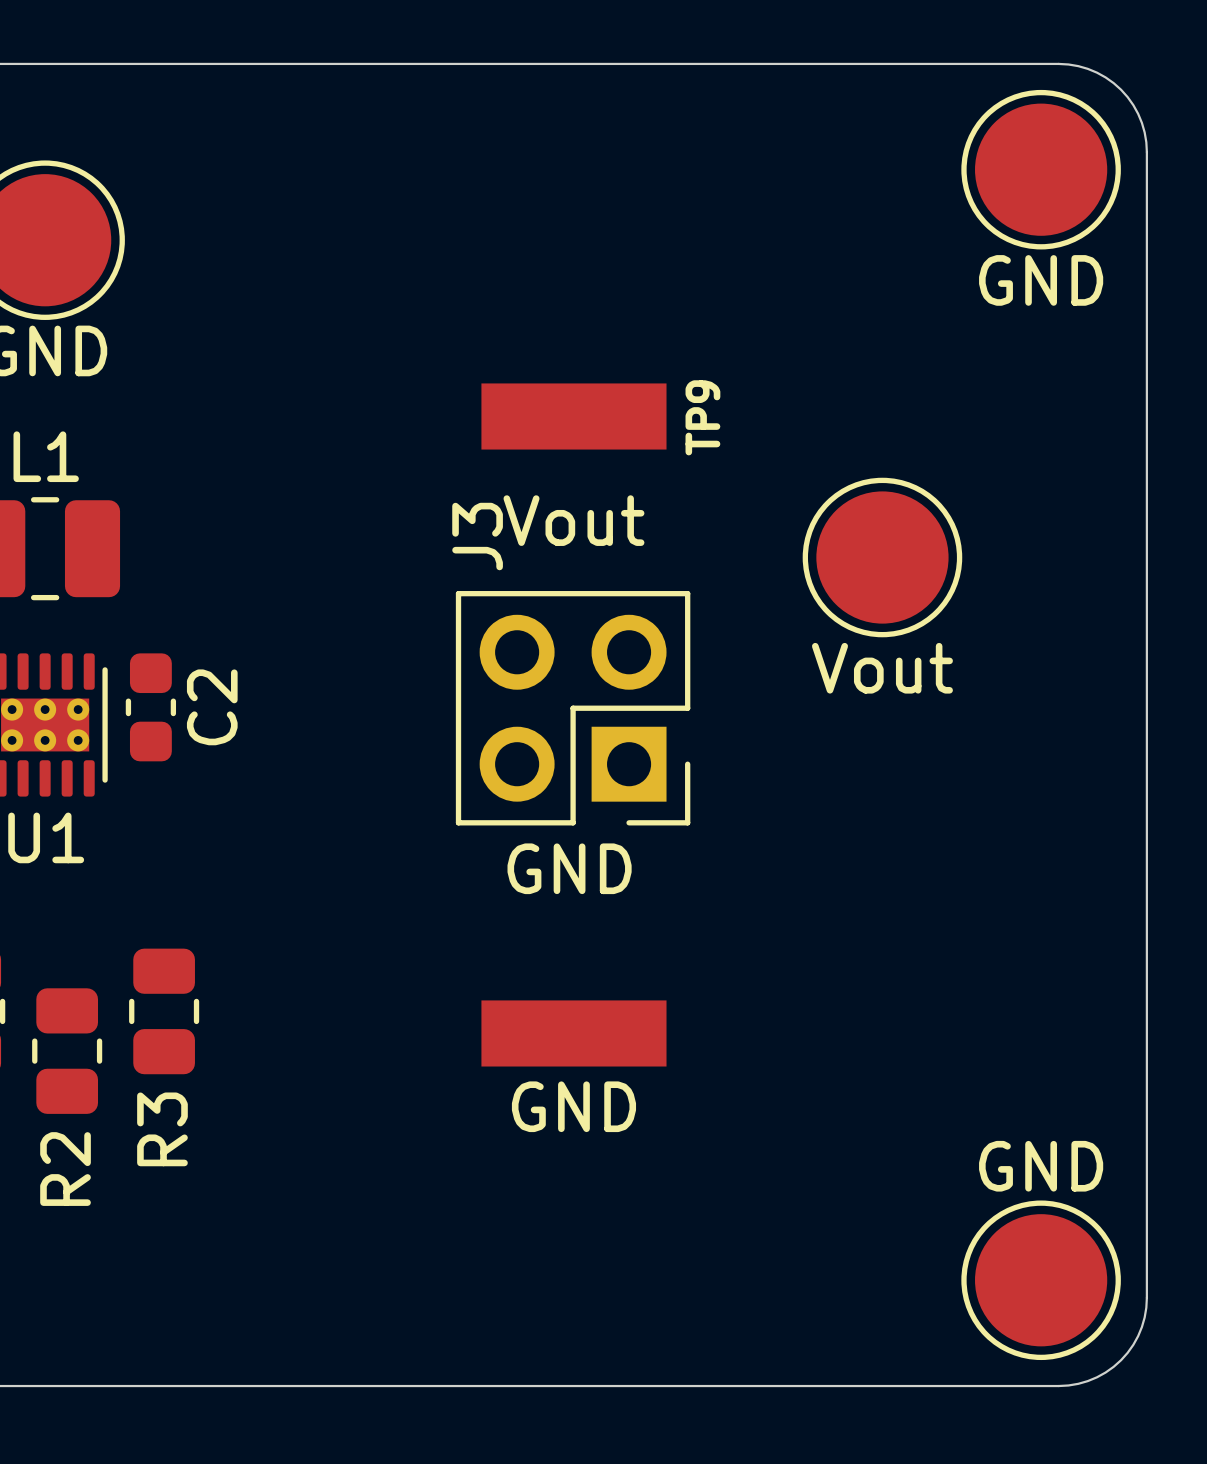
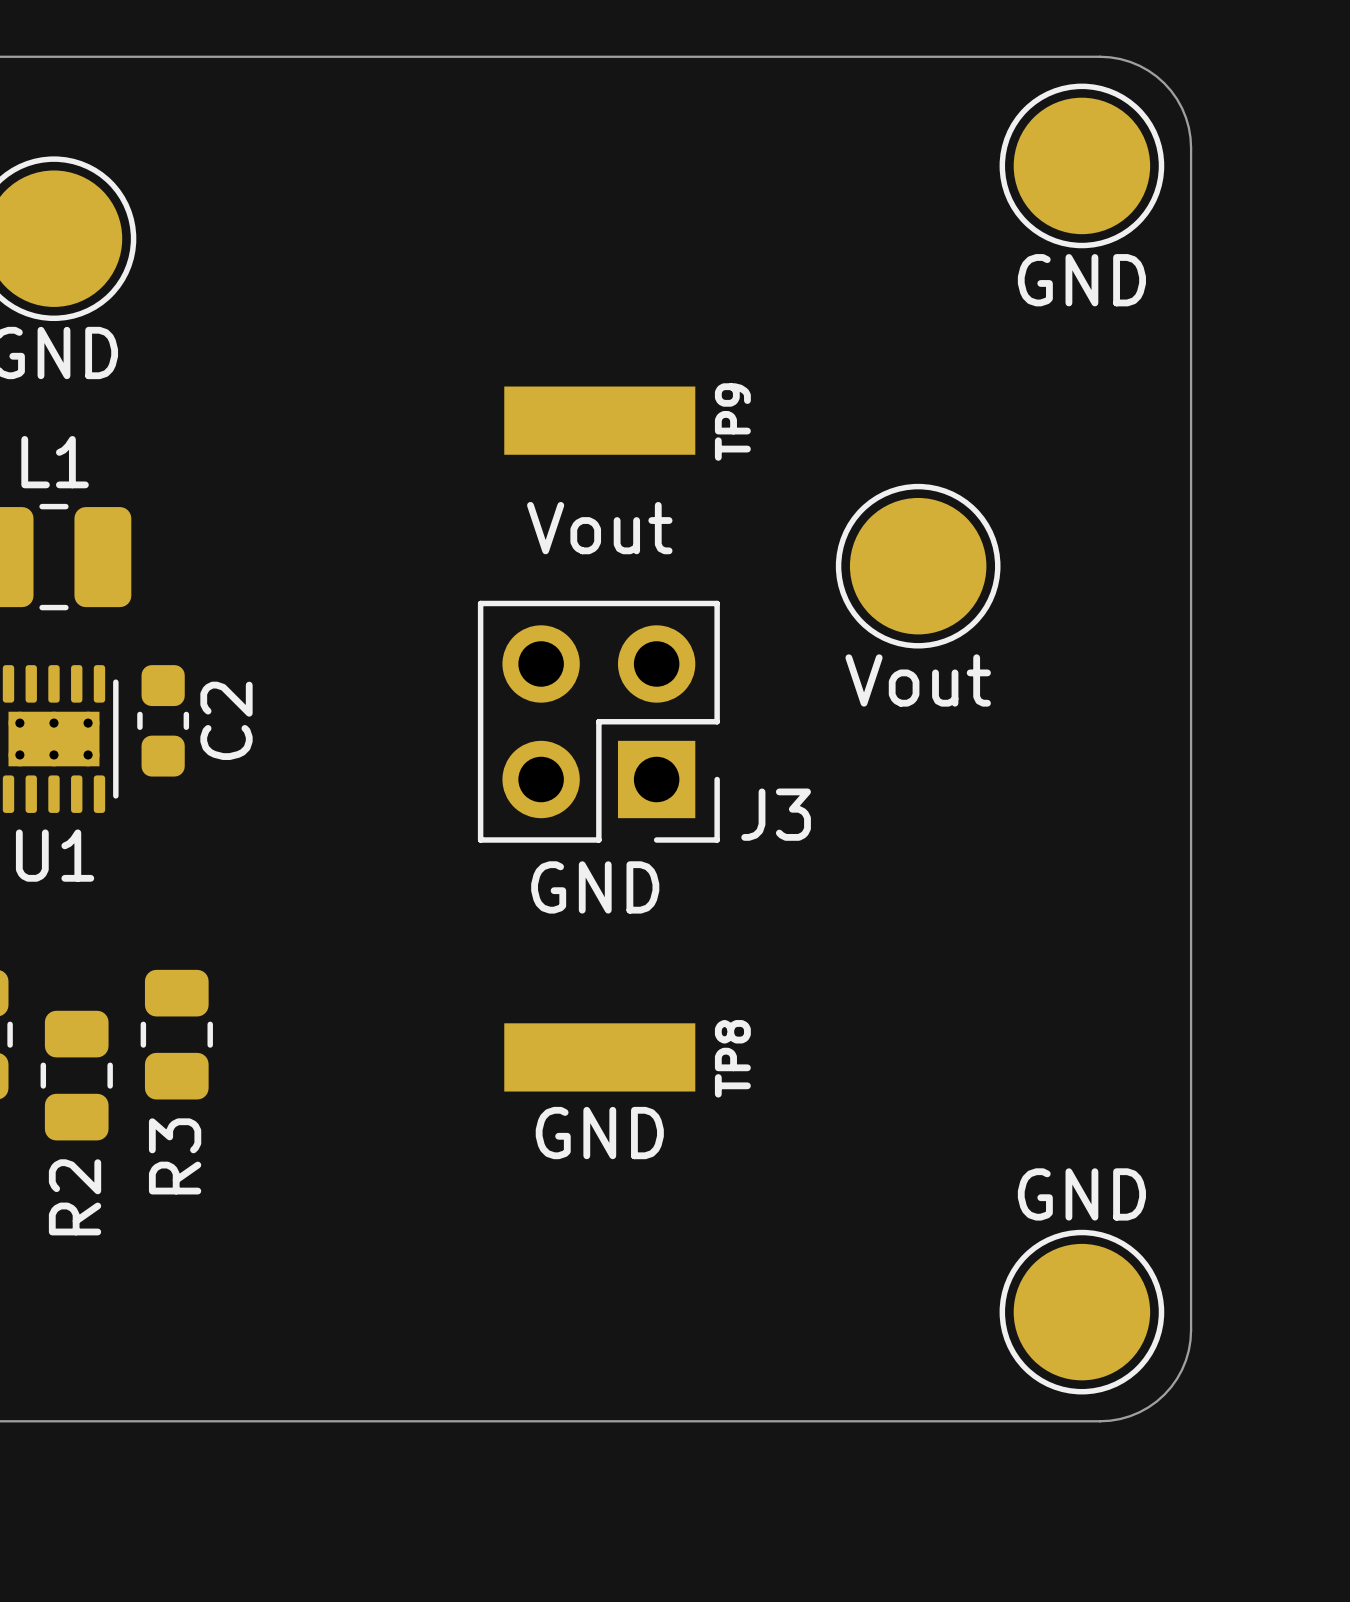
J3 name rotation: 0° (477, 536) -> 90° clockwise (776, 814)
J3 name position: J3 (477, 536) -> J3 (776, 814)
TP8 name: none -> TP8 (732, 1058)

